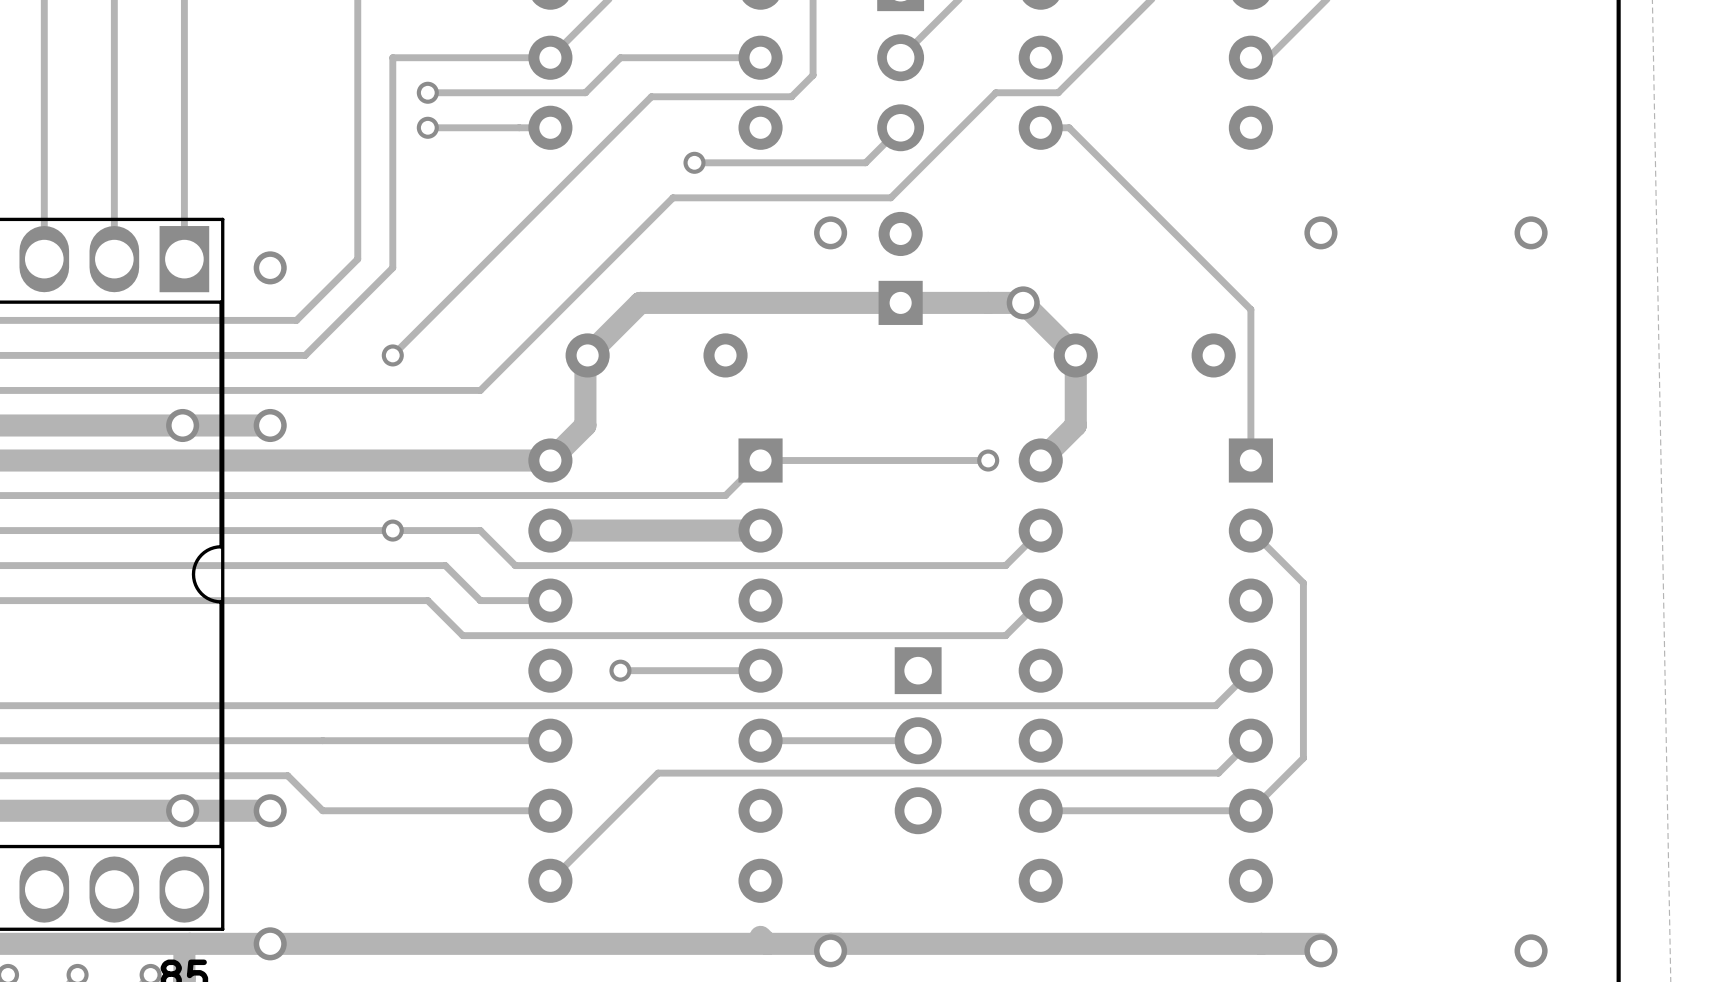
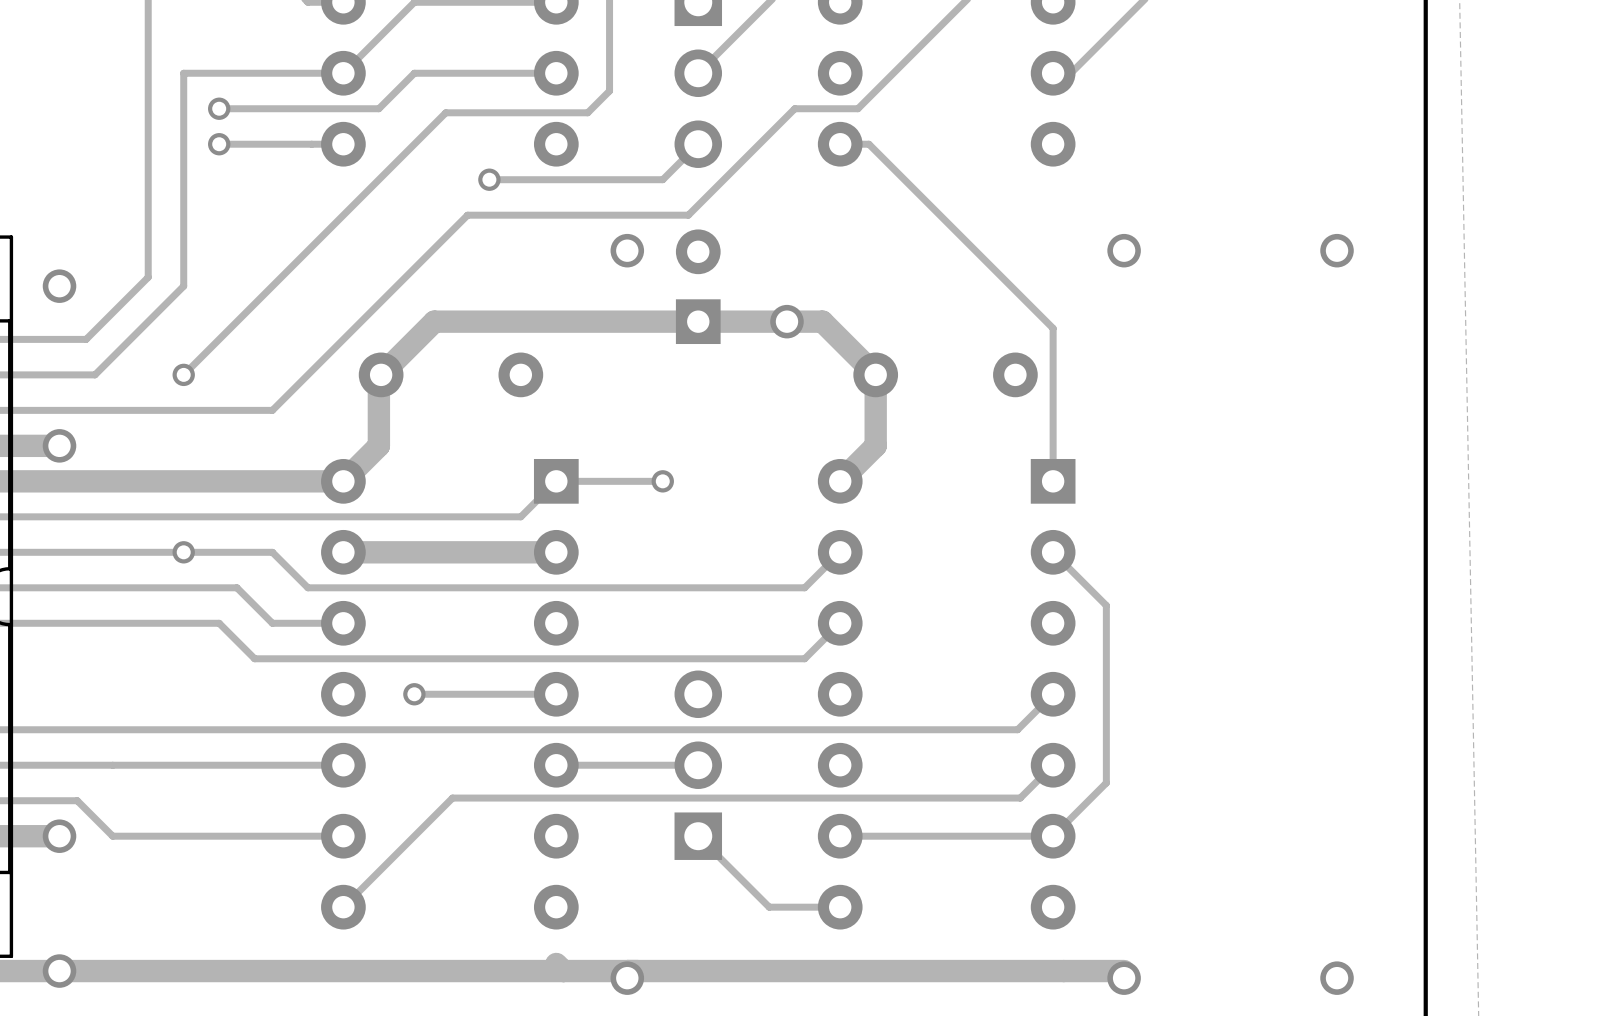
via position: (1023, 302) -> (786, 321)
track: (988, 460) (865, 460) -> none
via position: (988, 460) -> (662, 481)
part rotation: 0° (918, 740) -> 180° (698, 765)
track: none -> (698, 836) (769, 907) (840, 907)

